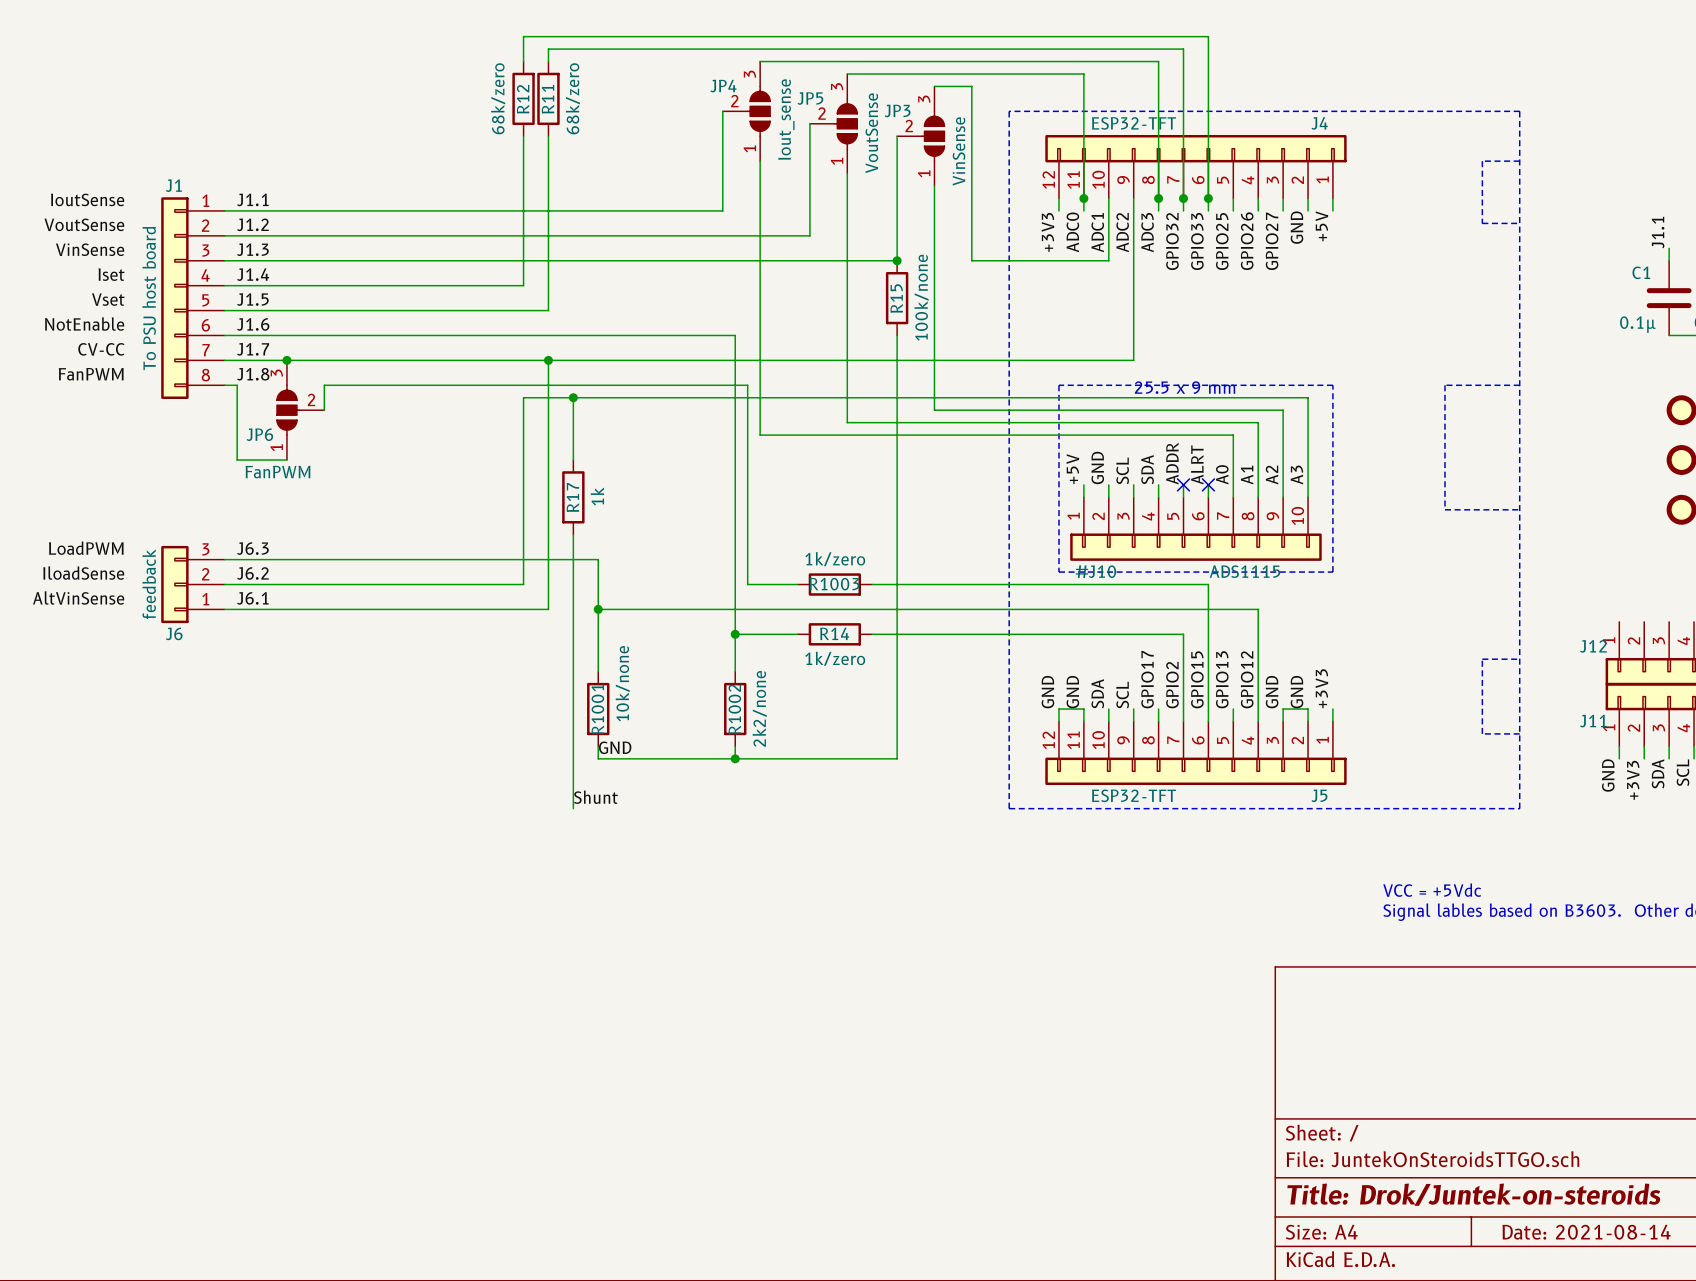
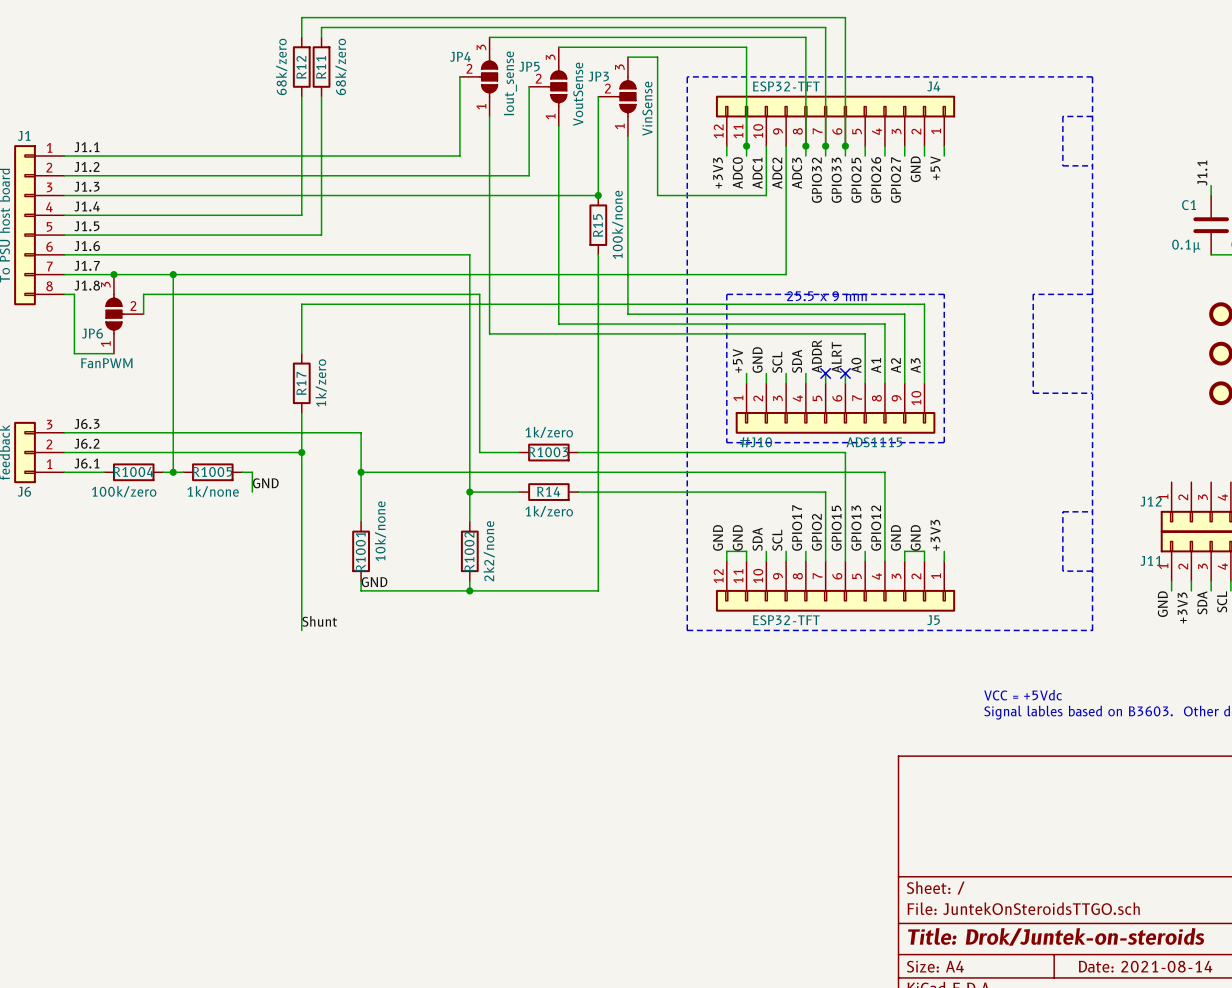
wire: none -> (173, 274) (173, 472)
junction: none -> (173, 274)
wire: (548, 360) (548, 609) (461, 609) -> (252, 492) (252, 472)
junction: (548, 360) -> none
wire: (573, 397) (573, 460) -> none
junction: (573, 397) -> none
wire: (523, 460) (523, 534) -> none
R17 value: 1k (597, 496) -> 1k/zero (321, 383)
R17 position: (573, 497) -> (301, 383)
wire: (573, 534) (573, 808) -> none
wire: none -> (301, 452) (301, 630)
junction: none -> (301, 452)
R1004: none -> 100k/zero (133, 472)
junction: none -> (173, 472)
R1005: none -> 1k/none (212, 472)
label: none -> GND (265, 483)
label position: Shunt (595, 797) -> Shunt (319, 621)

